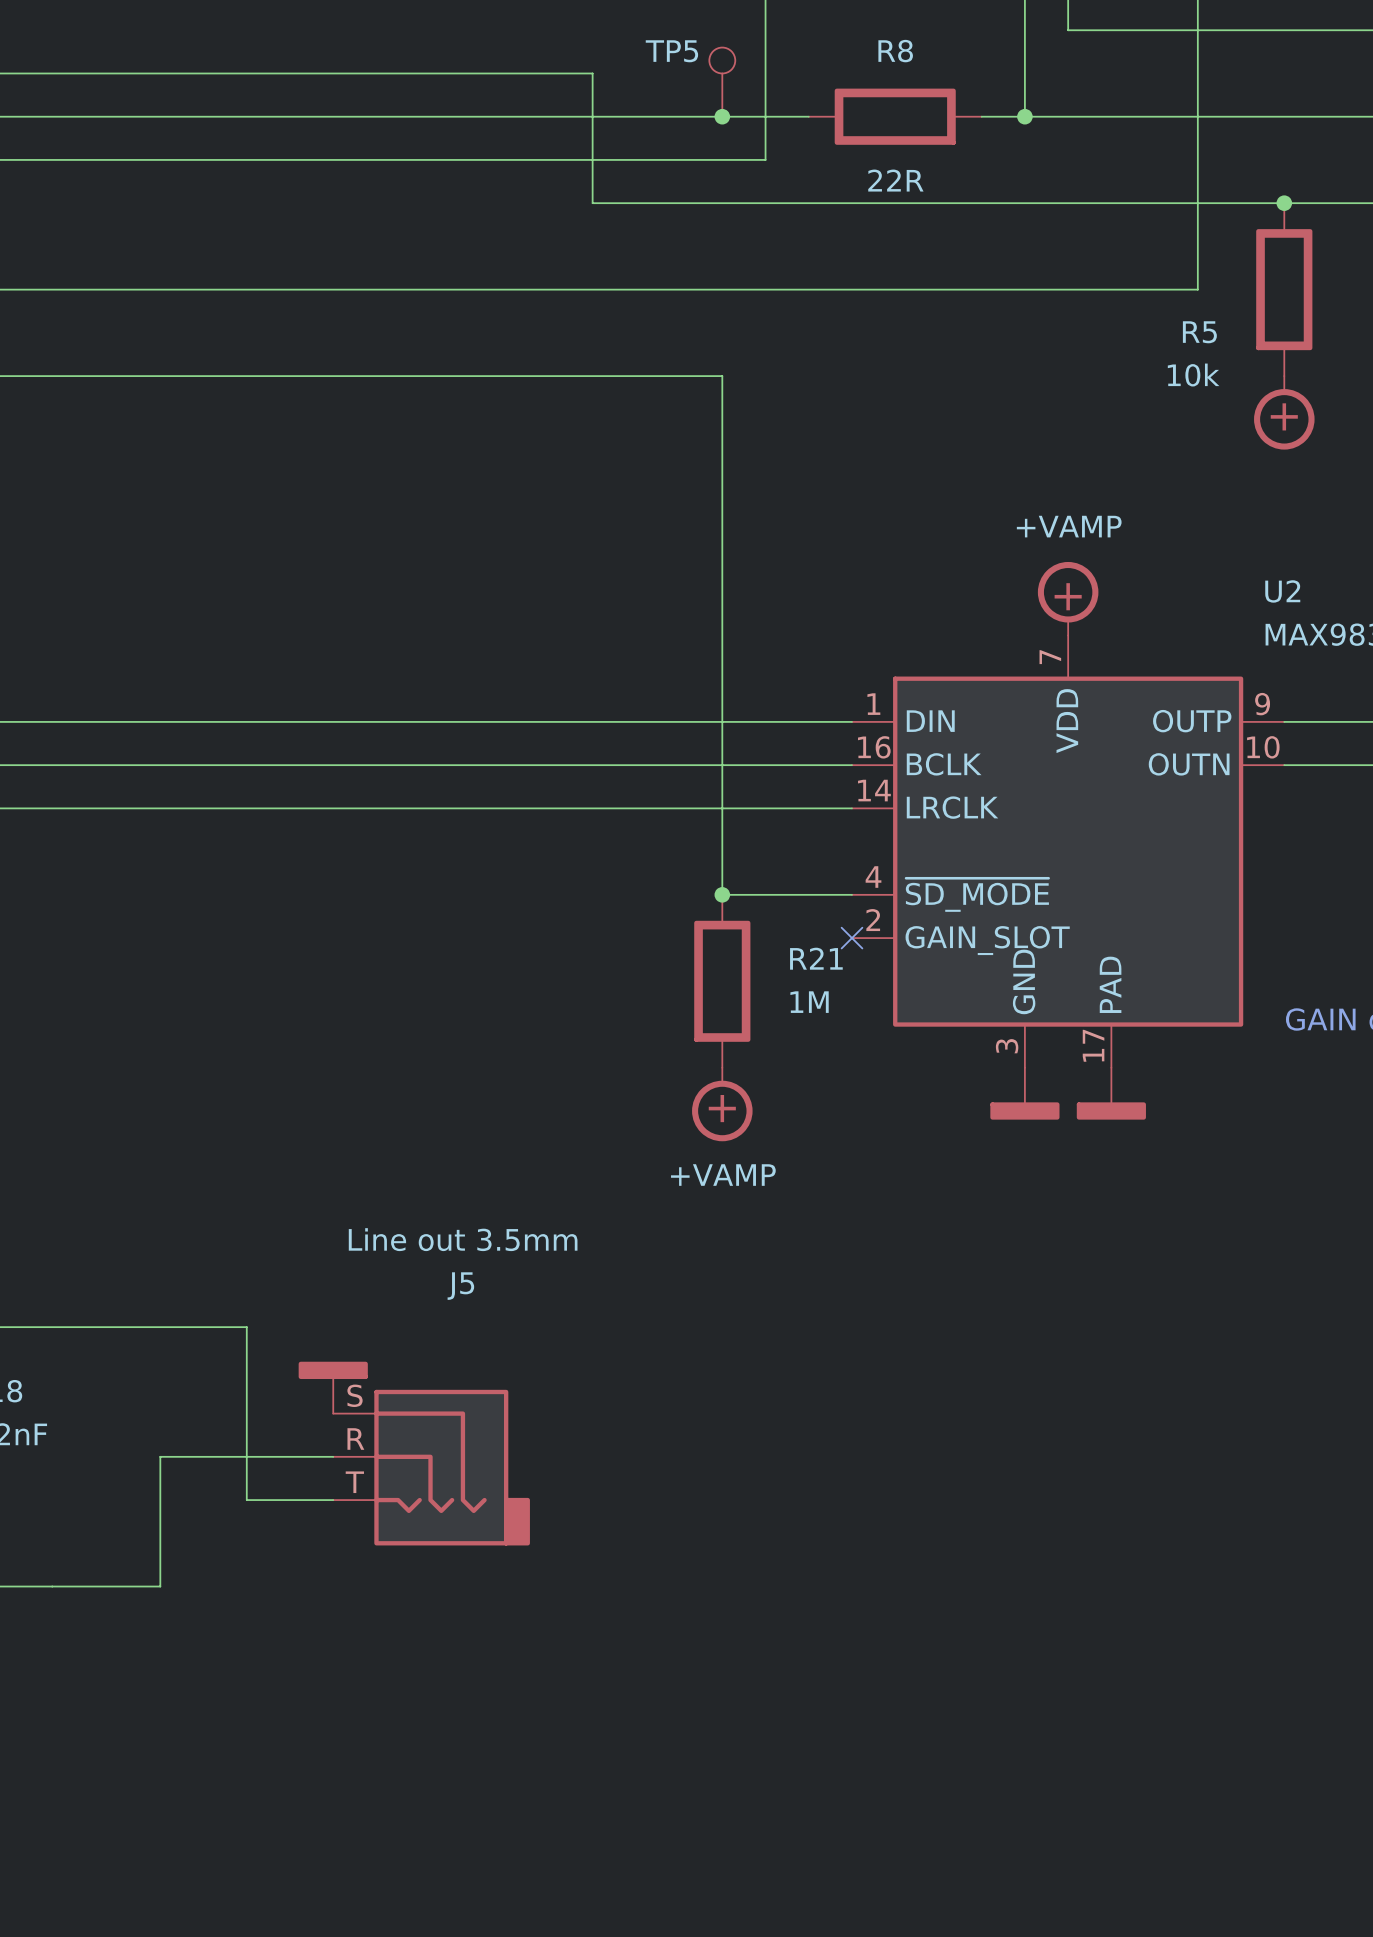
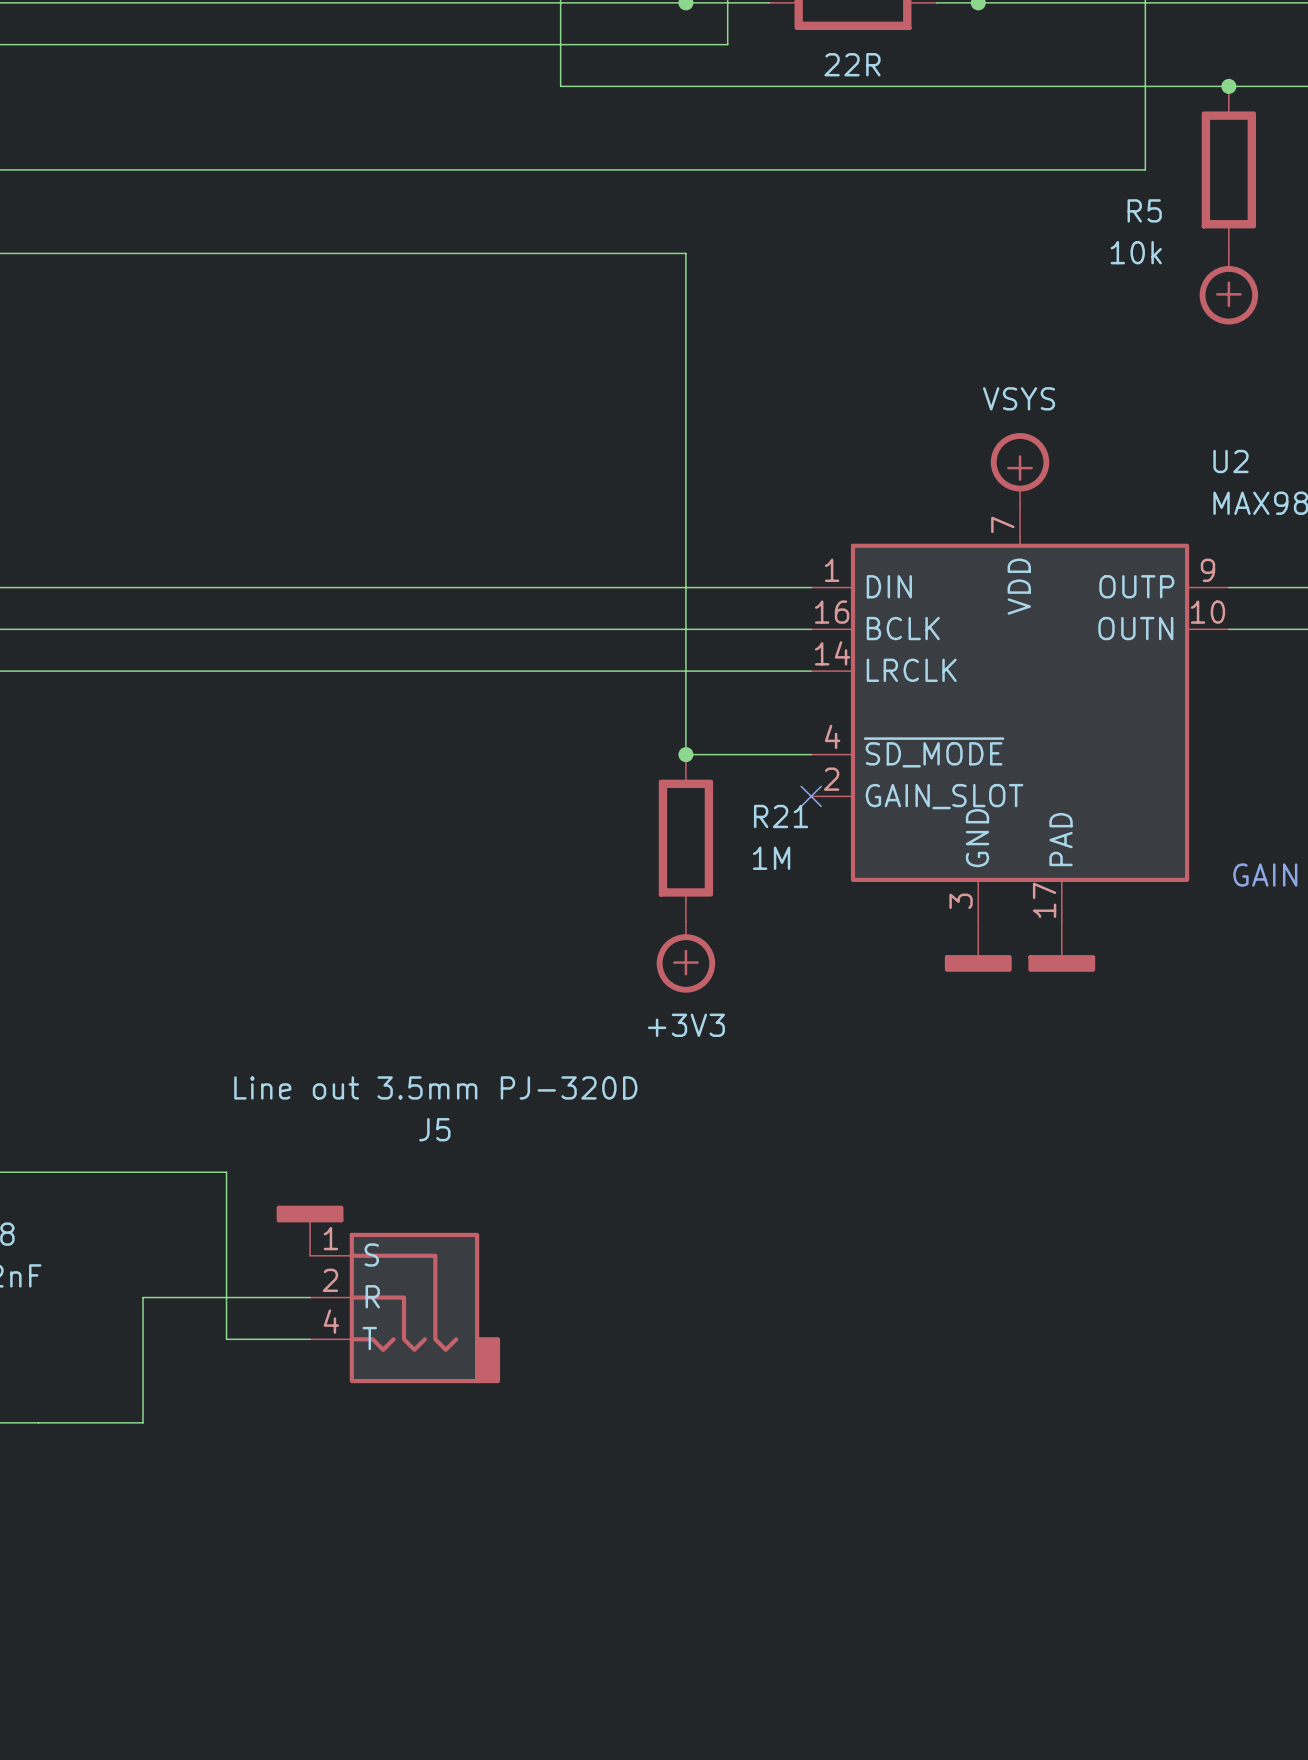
power symbol: +VAMP (1068, 598) -> VSYS (1020, 468)
power symbol: +VAMP (722, 1104) -> +3V3 (685, 957)
J5 value: Line out 3.5mm (463, 1239) -> Line out 3.5mm PJ-320D (435, 1087)
J5 pin number: S (355, 1395) -> 1 (330, 1238)
J5 pin name: none -> S (371, 1255)
J5 pin number: R (355, 1439) -> 2 (330, 1280)
J5 pin name: none -> R (372, 1296)
J5 pin number: T (354, 1482) -> 4 (331, 1321)
J5 pin name: none -> T (369, 1338)

